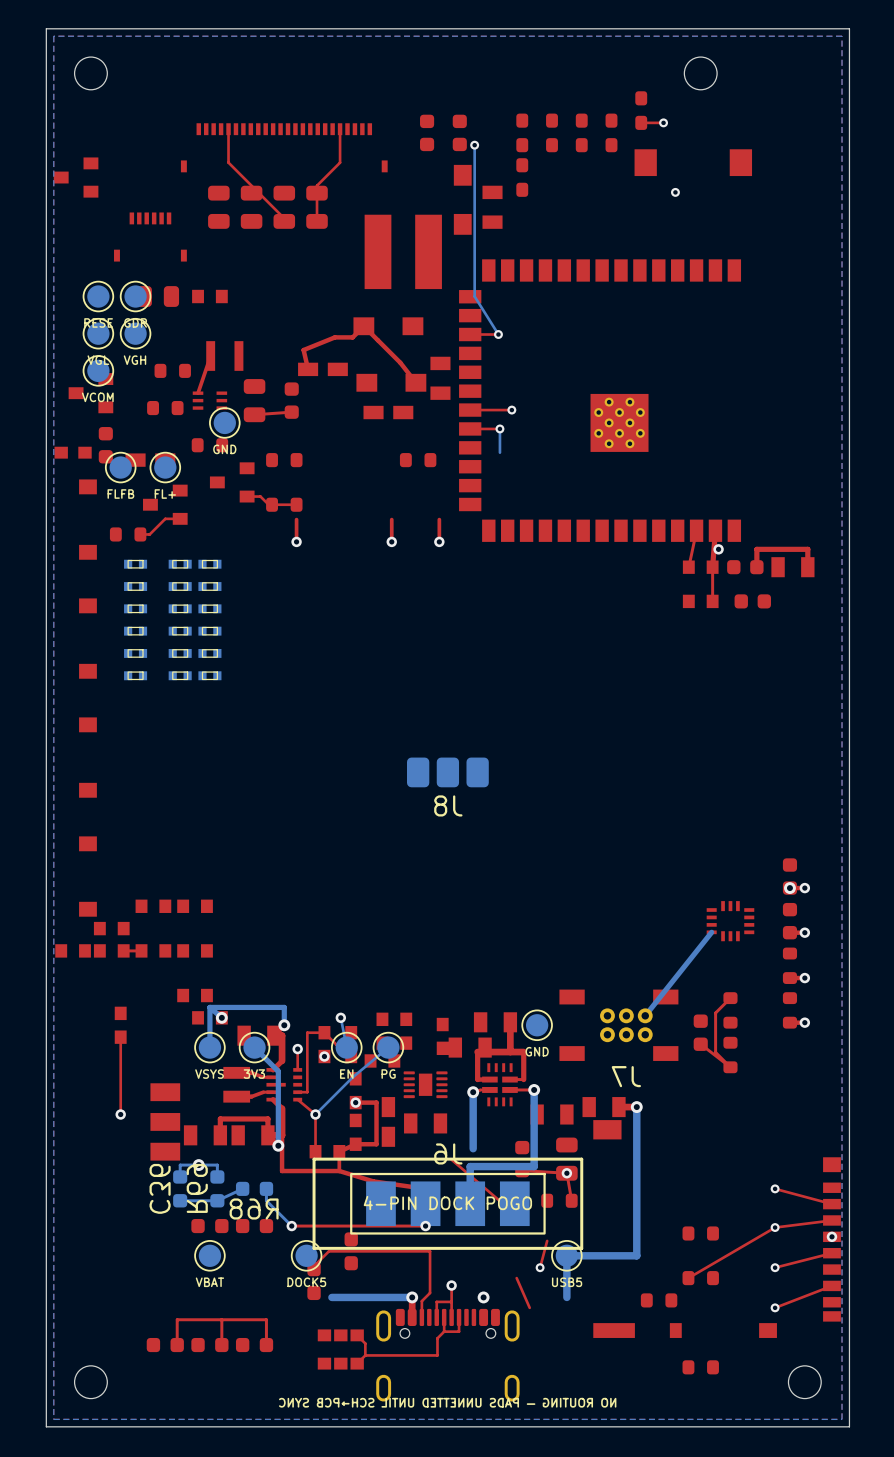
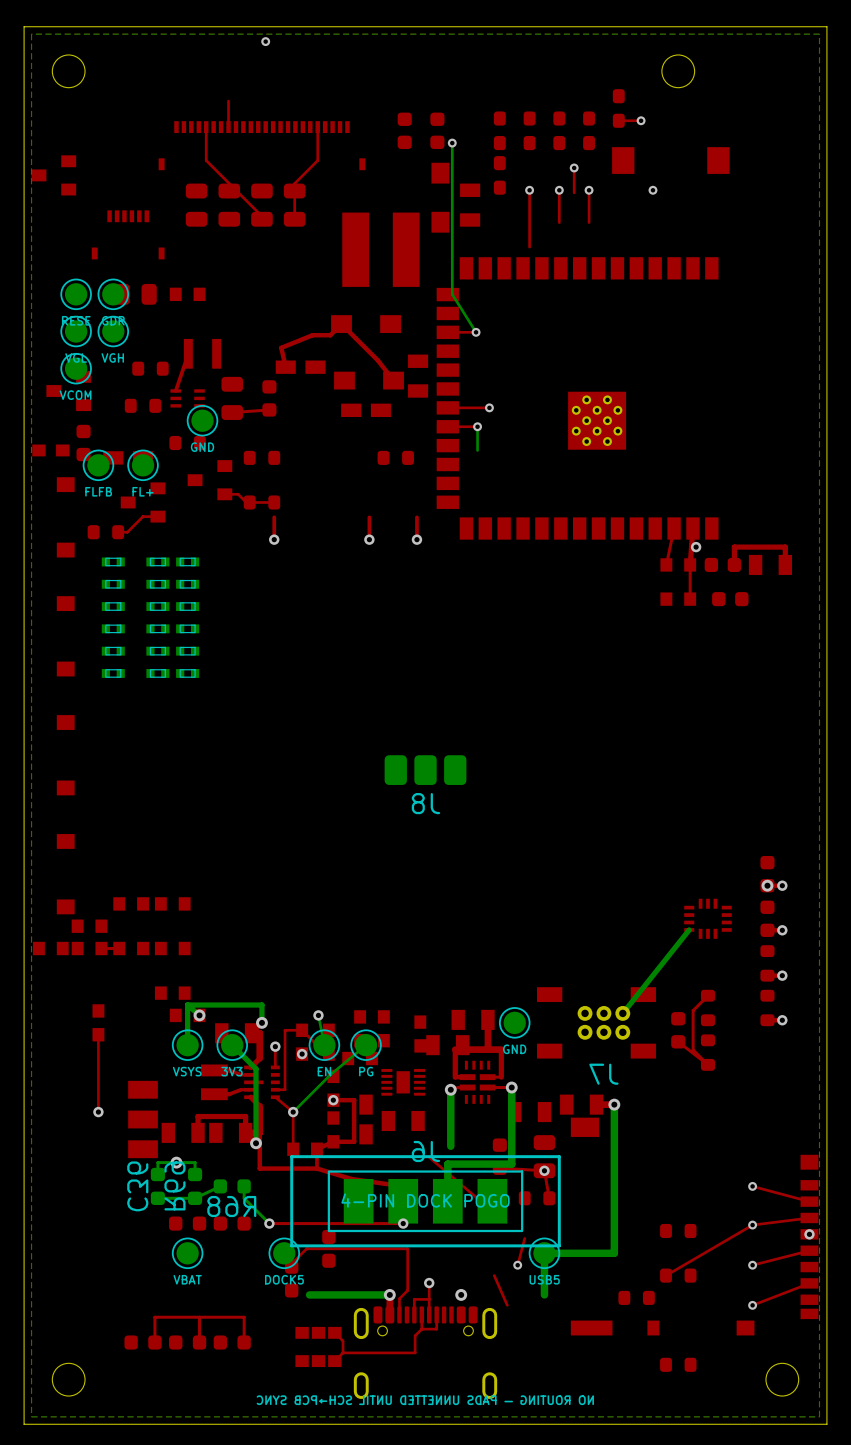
via: none -> (265, 41)
top track: none -> (228, 101) (228, 127)
top track: none -> (574, 167) (574, 192)
via: none -> (574, 167)
top track: none -> (529, 190) (529, 247)
via: none -> (529, 190)
top track: none -> (559, 190) (559, 222)
via: none -> (559, 190)
top track: none -> (589, 190) (589, 222)
via: none -> (589, 190)

